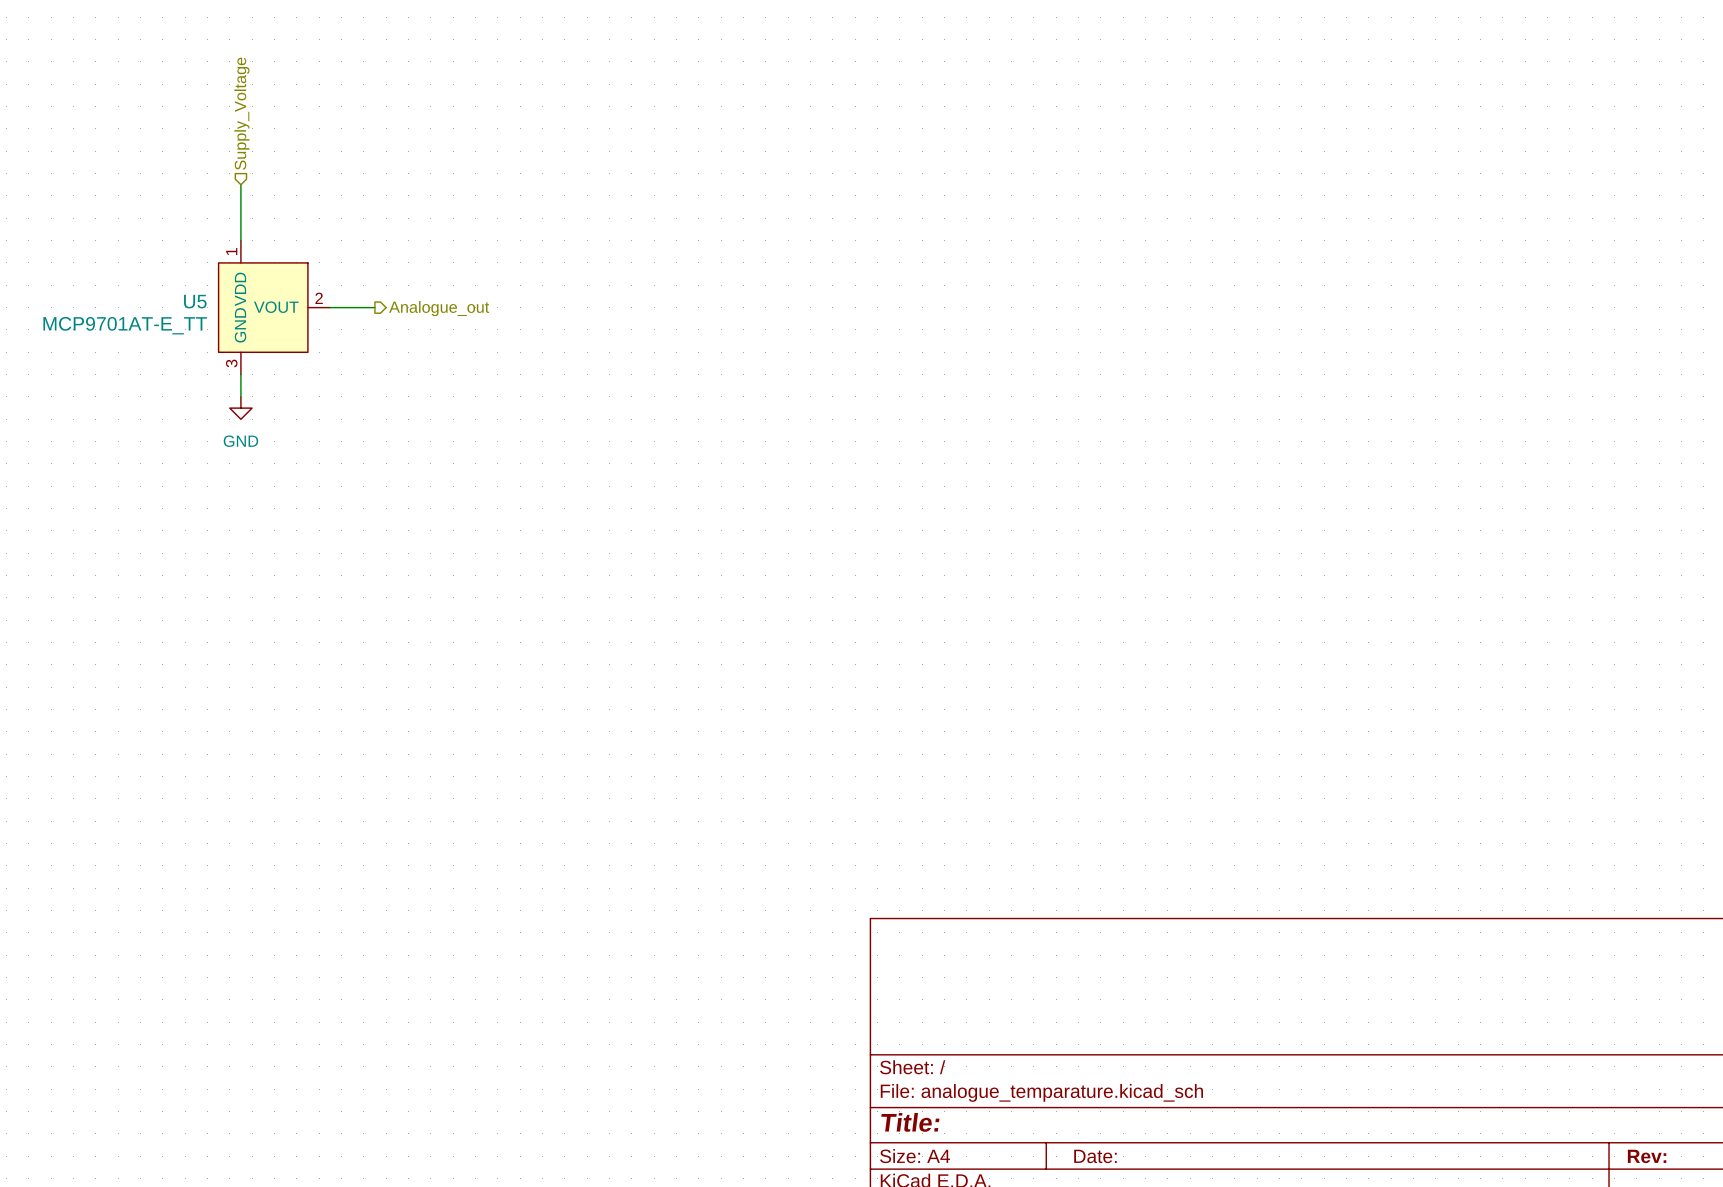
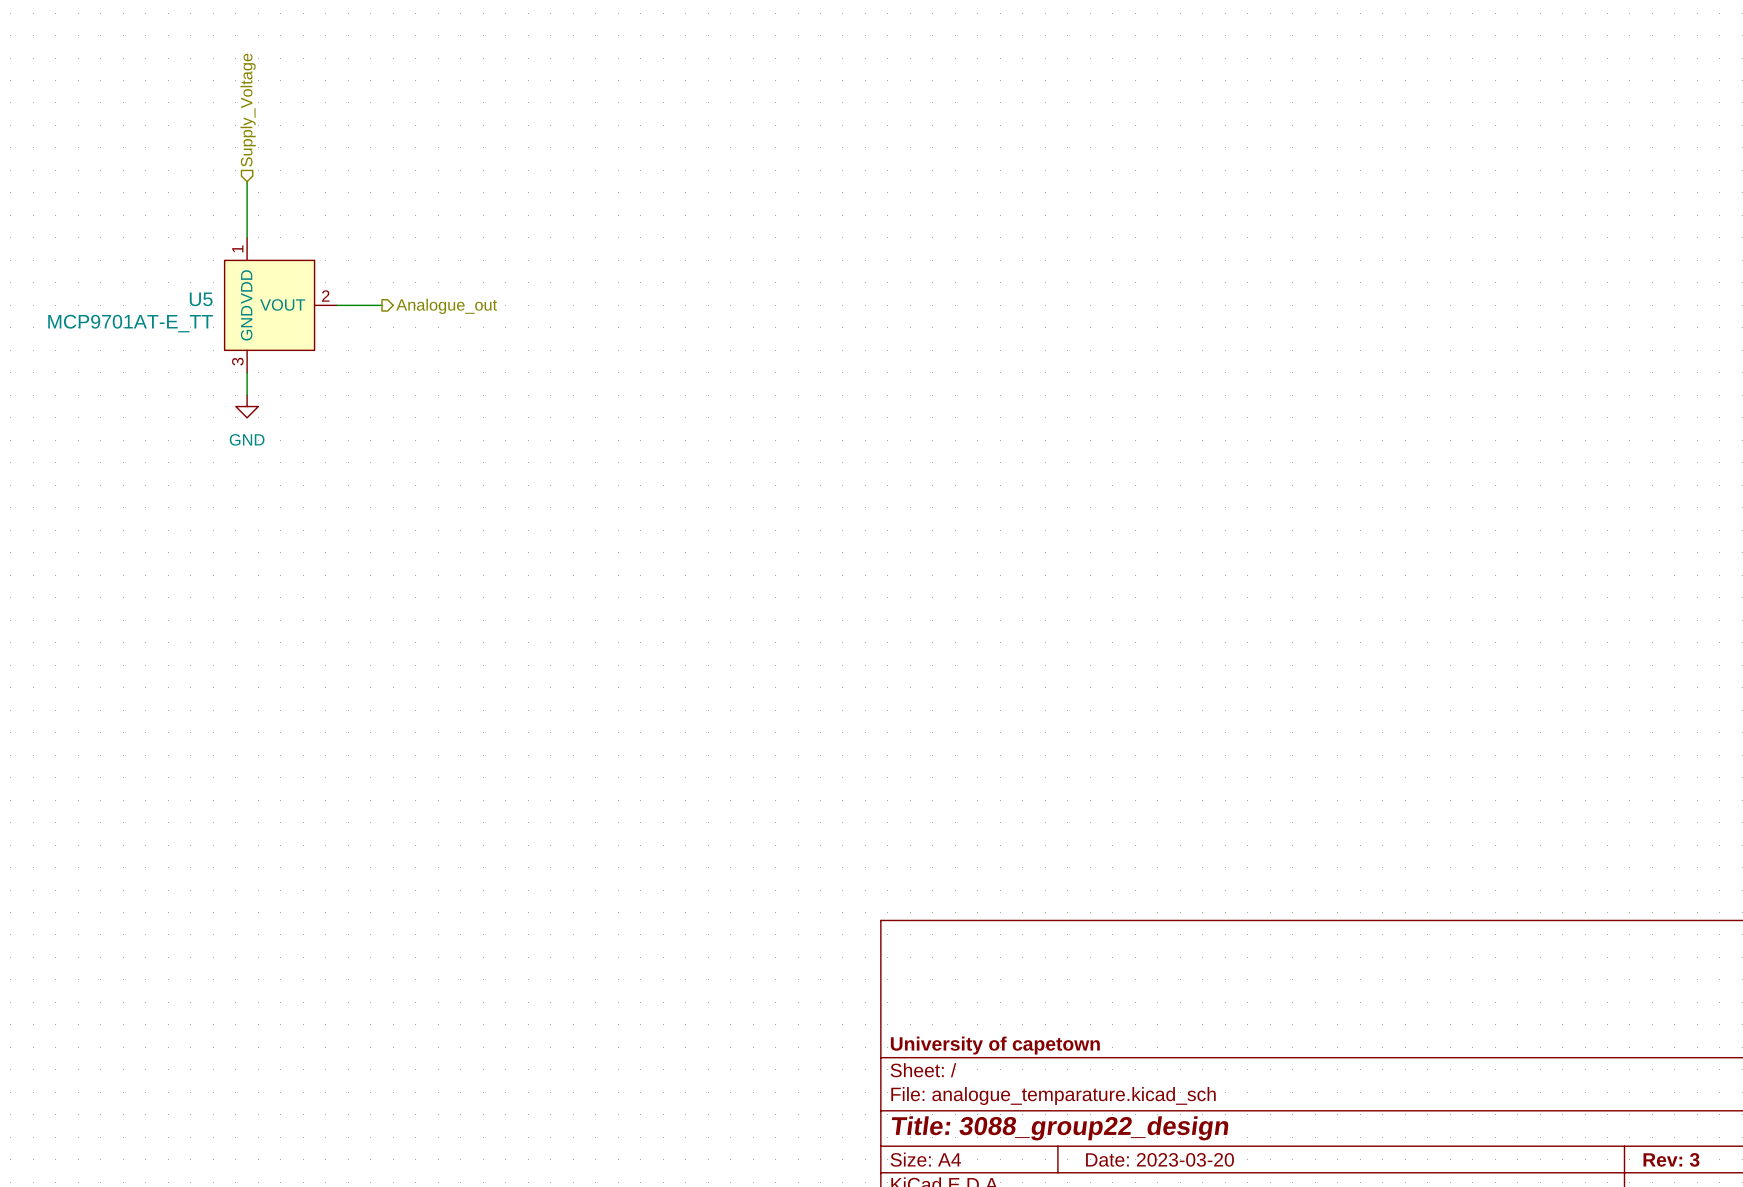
title block: none -> University of capetown (995, 1045)
title block: Title: (910, 1122) -> Title: 3088_group22_design (1060, 1128)
title block: Date: (1095, 1156) -> Date: 2023-03-20 (1160, 1159)
title block: Rev: (1647, 1156) -> Rev: 3 (1671, 1159)

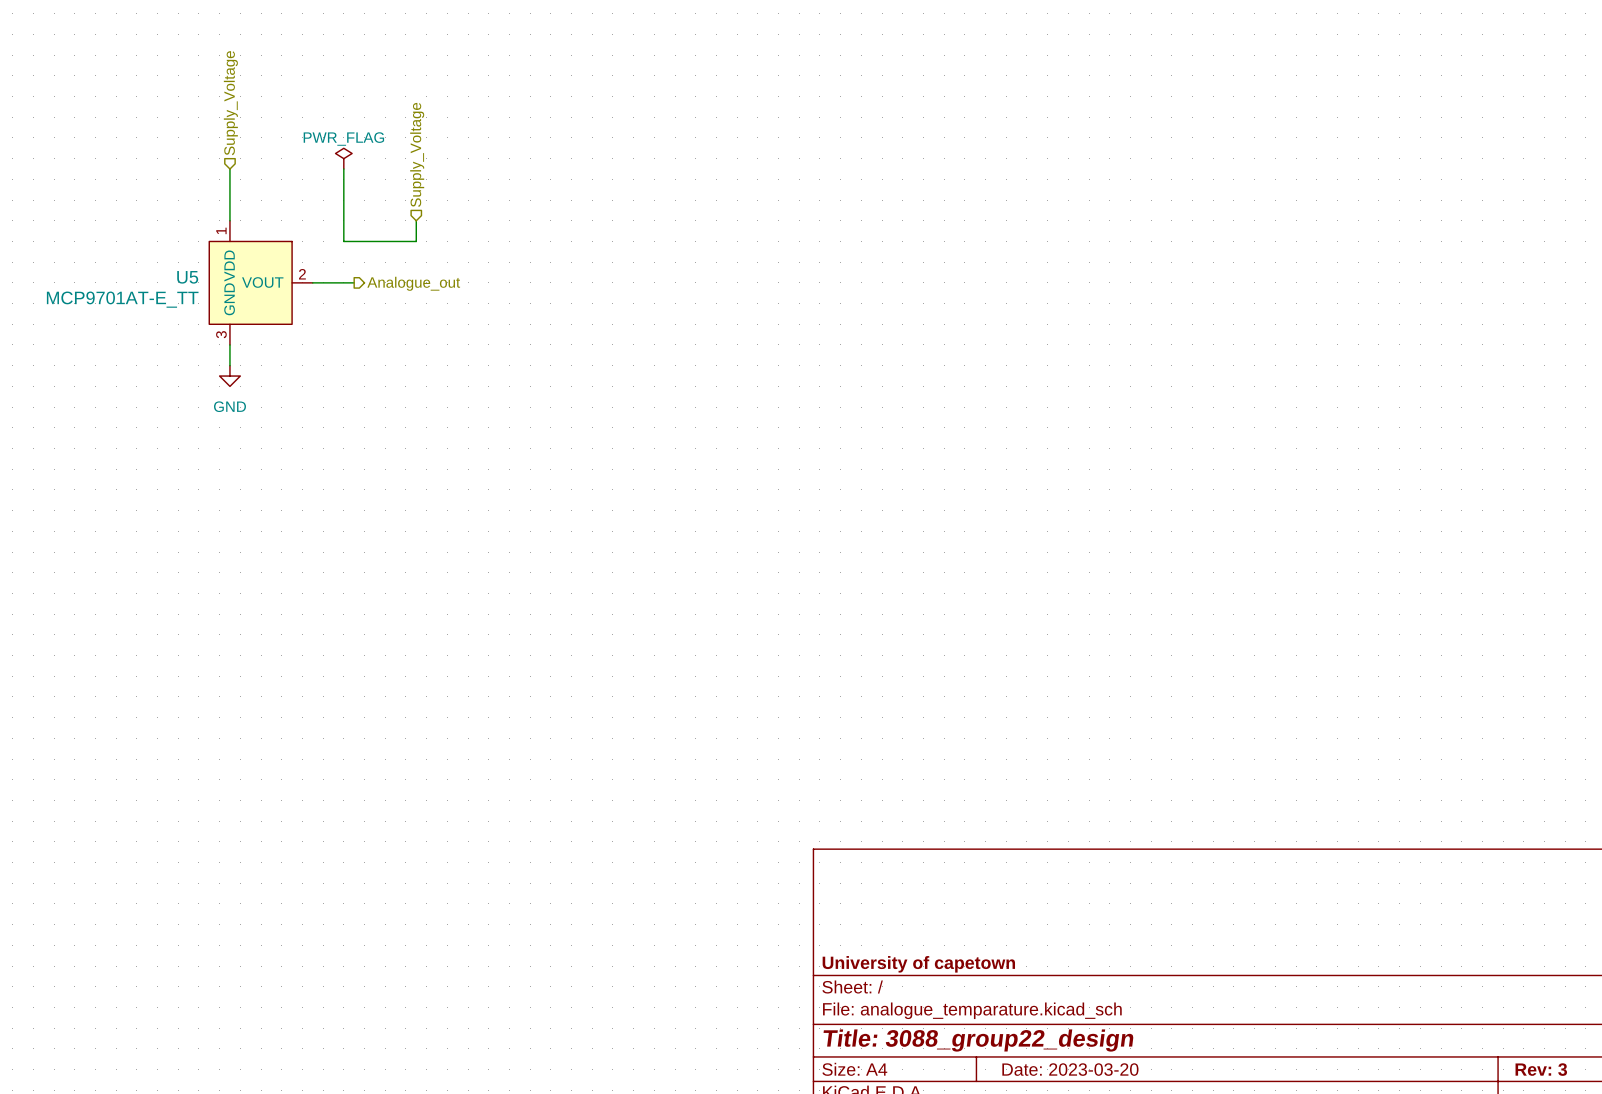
hierarchical label: none -> Supply_Voltage (417, 154)
power symbol: none -> PWR_FLAG (343, 158)
wire: none -> (343, 169) (343, 241) (416, 241) (416, 220)

